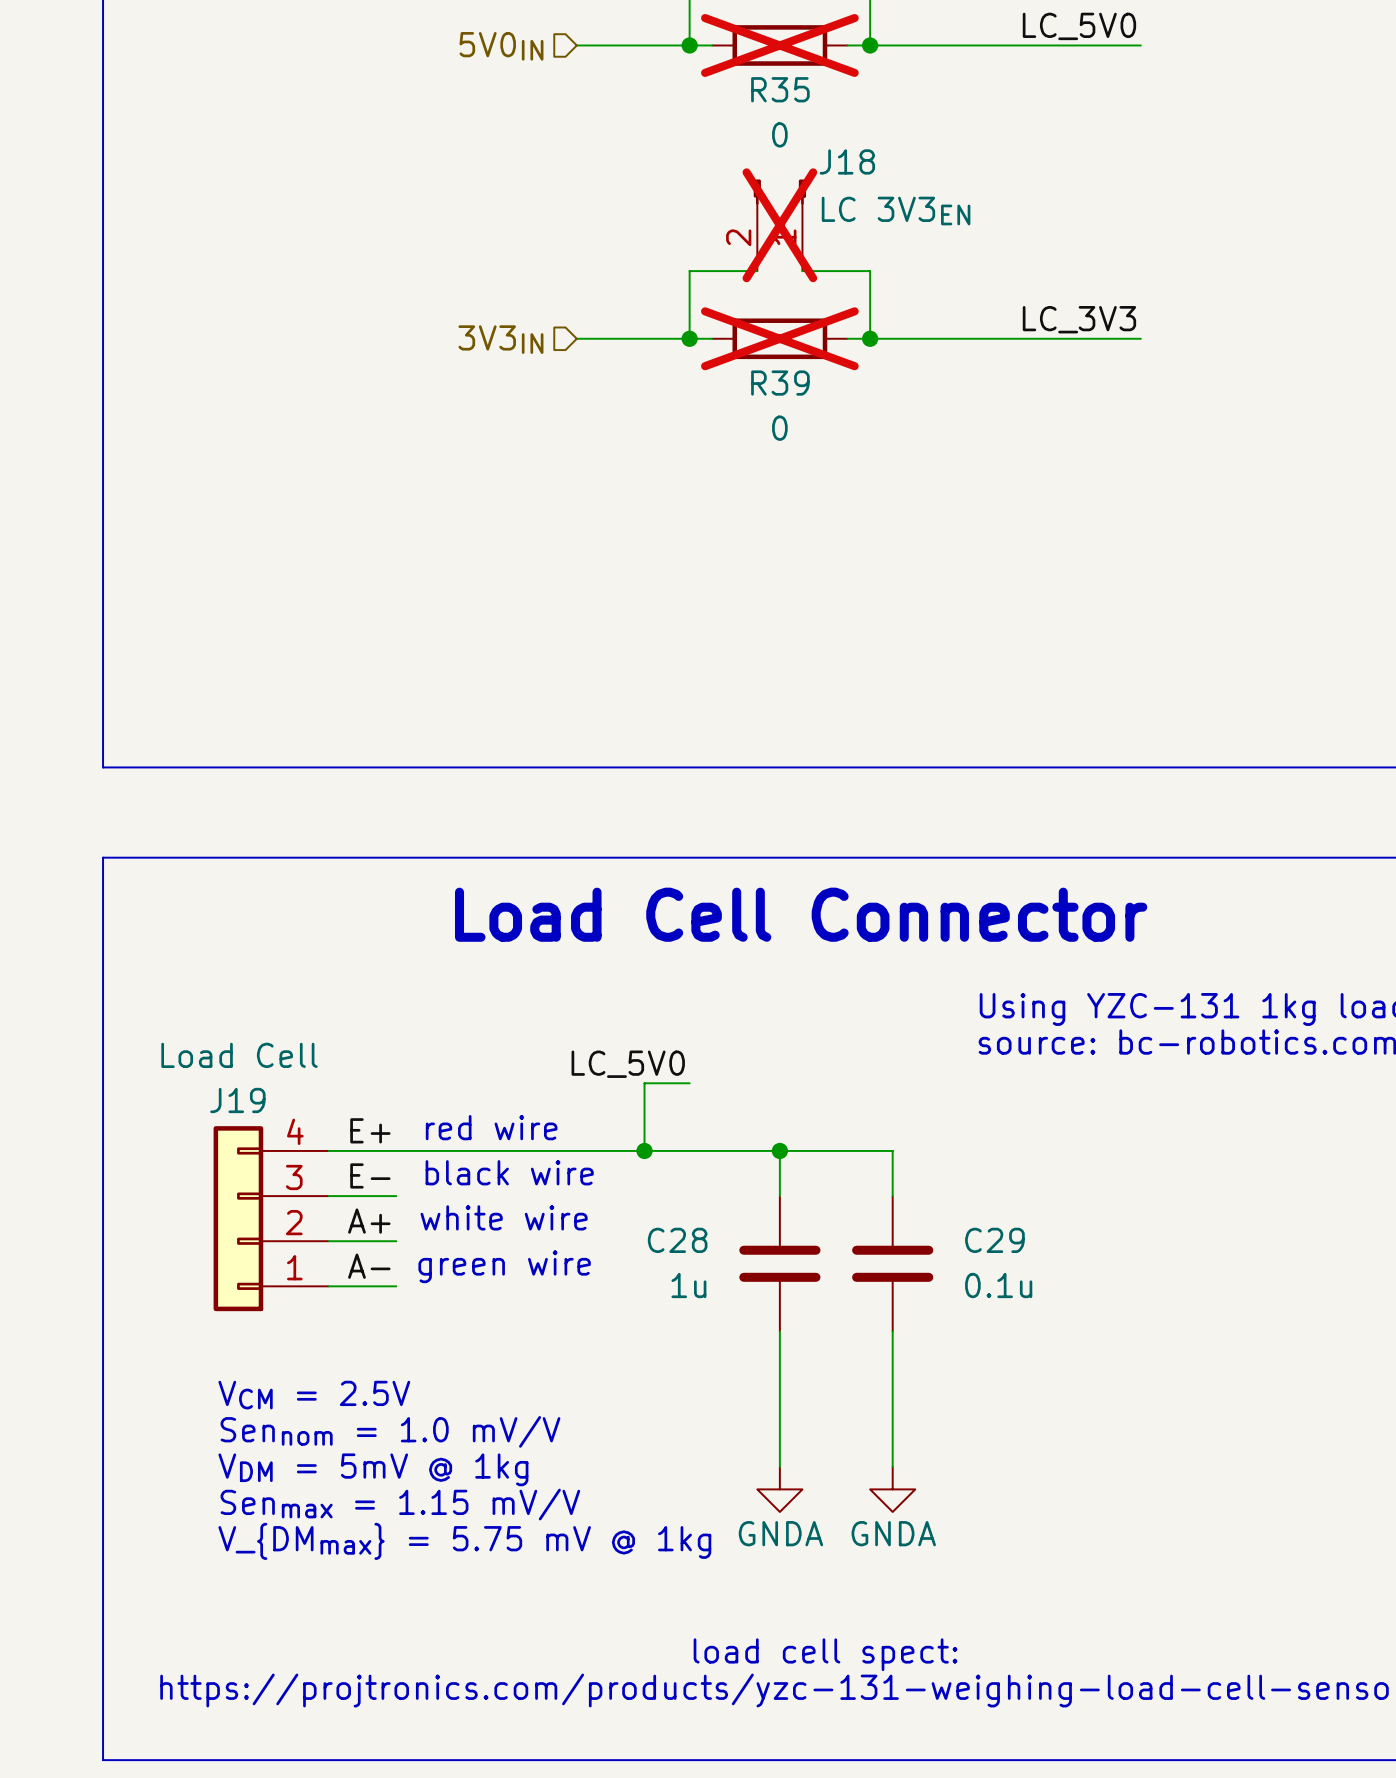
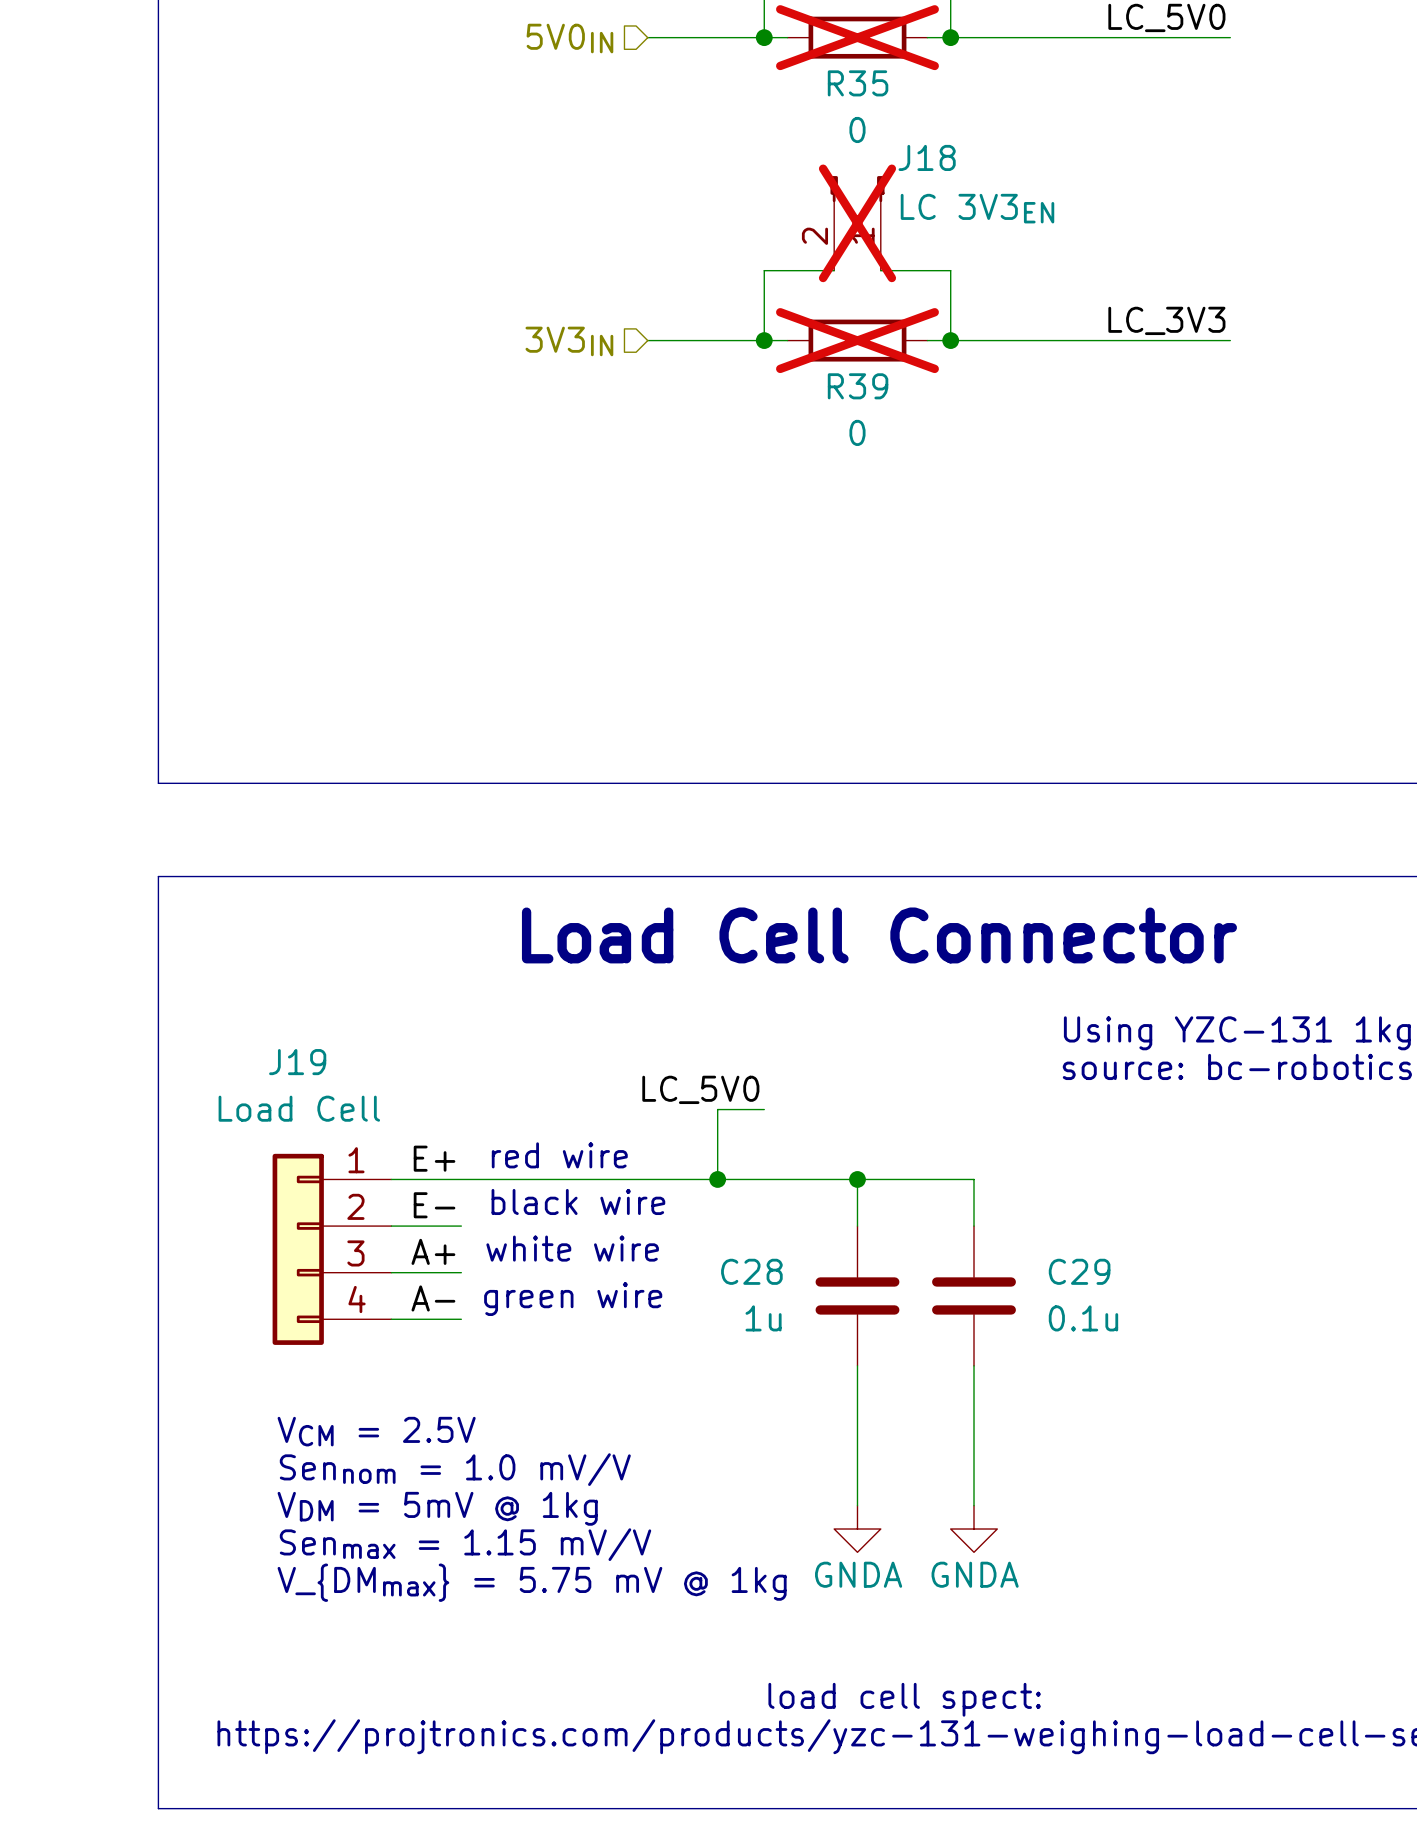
J19 name position: J19 (237, 1100) -> J19 (297, 1062)
J19 flip: as is (238, 1218) -> up-down (298, 1249)

